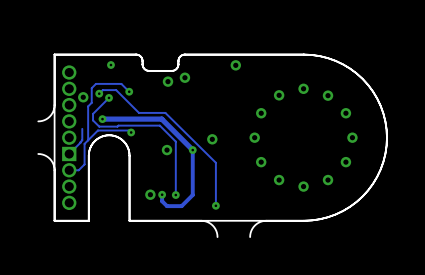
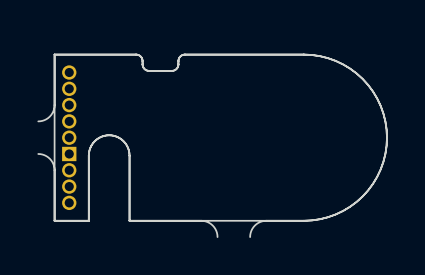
via: (110, 65) -> none
via: (235, 65) -> none
via: (184, 77) -> none
via: (167, 81) -> none
via: (303, 88) -> none
track: (129, 91) (121, 83) (95, 83) (91, 88) (91, 102) (88, 106) (88, 140) -> none
via: (129, 91) -> none
track: (99, 93) (102, 90) (116, 90) (138, 112) (165, 112) (215, 162) (215, 205) -> none
via: (99, 93) -> none
via: (279, 95) -> none
via: (328, 95) -> none
via: (83, 97) -> none
track: (109, 97) (93, 113) (93, 120) (99, 126) (159, 125) (175, 141) (175, 195) -> none
via: (109, 97) -> none
via: (261, 113) -> none
via: (345, 113) -> none
track: (102, 119) (161, 119) (192, 150) (192, 195) (181, 206) (167, 206) (162, 201) (162, 194) -> none
via: (102, 119) -> none
track: (82, 128) (82, 140) (69, 153) -> none
track: (131, 132) (129, 130) (97, 130) (84, 143) (84, 164) (78, 170) (69, 170) -> none
via: (131, 132) -> none
via: (254, 137) -> none
via: (352, 137) -> none
via: (212, 139) -> none
via: (167, 150) -> none
via: (192, 150) -> none
via: (261, 162) -> none
via: (345, 162) -> none
via: (279, 180) -> none
via: (328, 180) -> none
via: (303, 186) -> none
via: (150, 194) -> none
via: (162, 194) -> none
via: (175, 195) -> none
via: (215, 205) -> none

